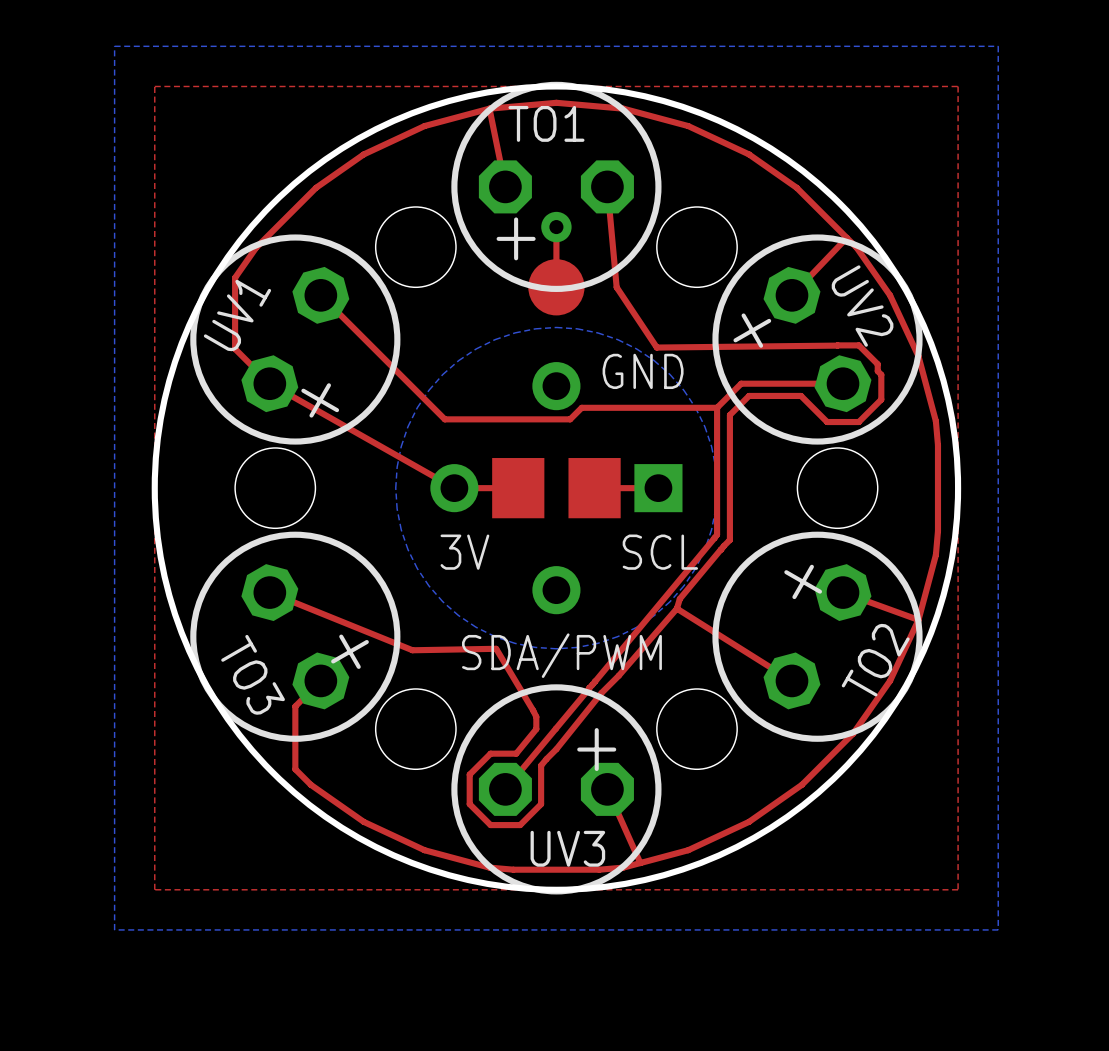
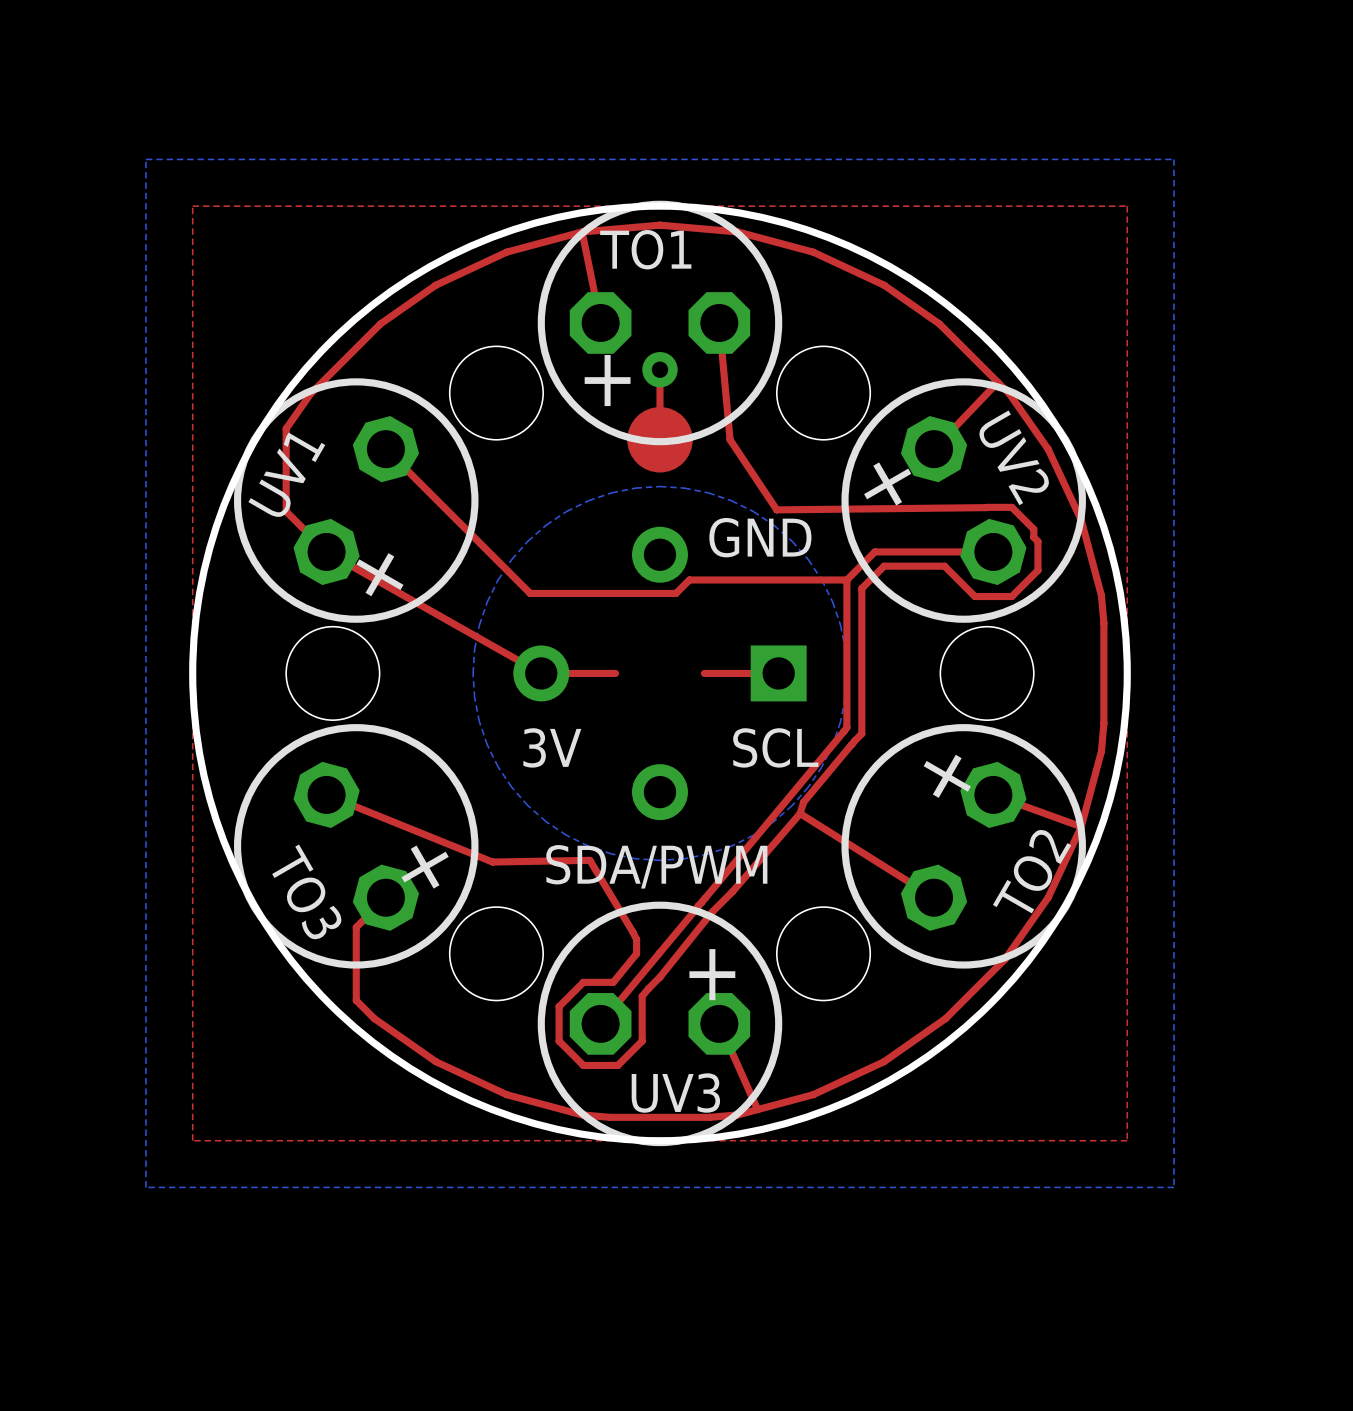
part: (556, 488) -> none

